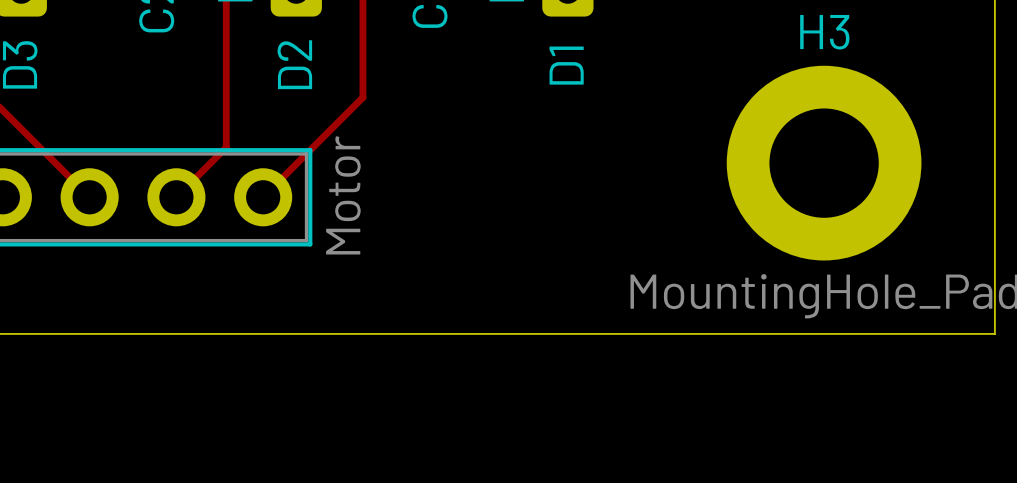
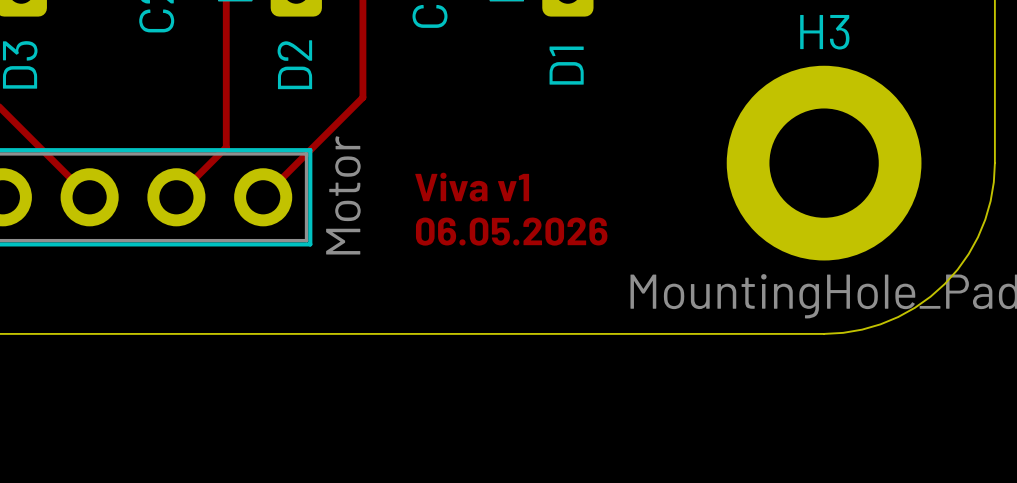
board edge: (994, 163) (994, 333) (824, 333) -> (994, 163) (990, 201) (977, 237) (957, 269) (944, 283) (914, 307) (880, 324) (843, 332) (824, 333)
text: none -> Viva v1 (472, 187)
text: none -> 06.05.2026 (511, 231)

